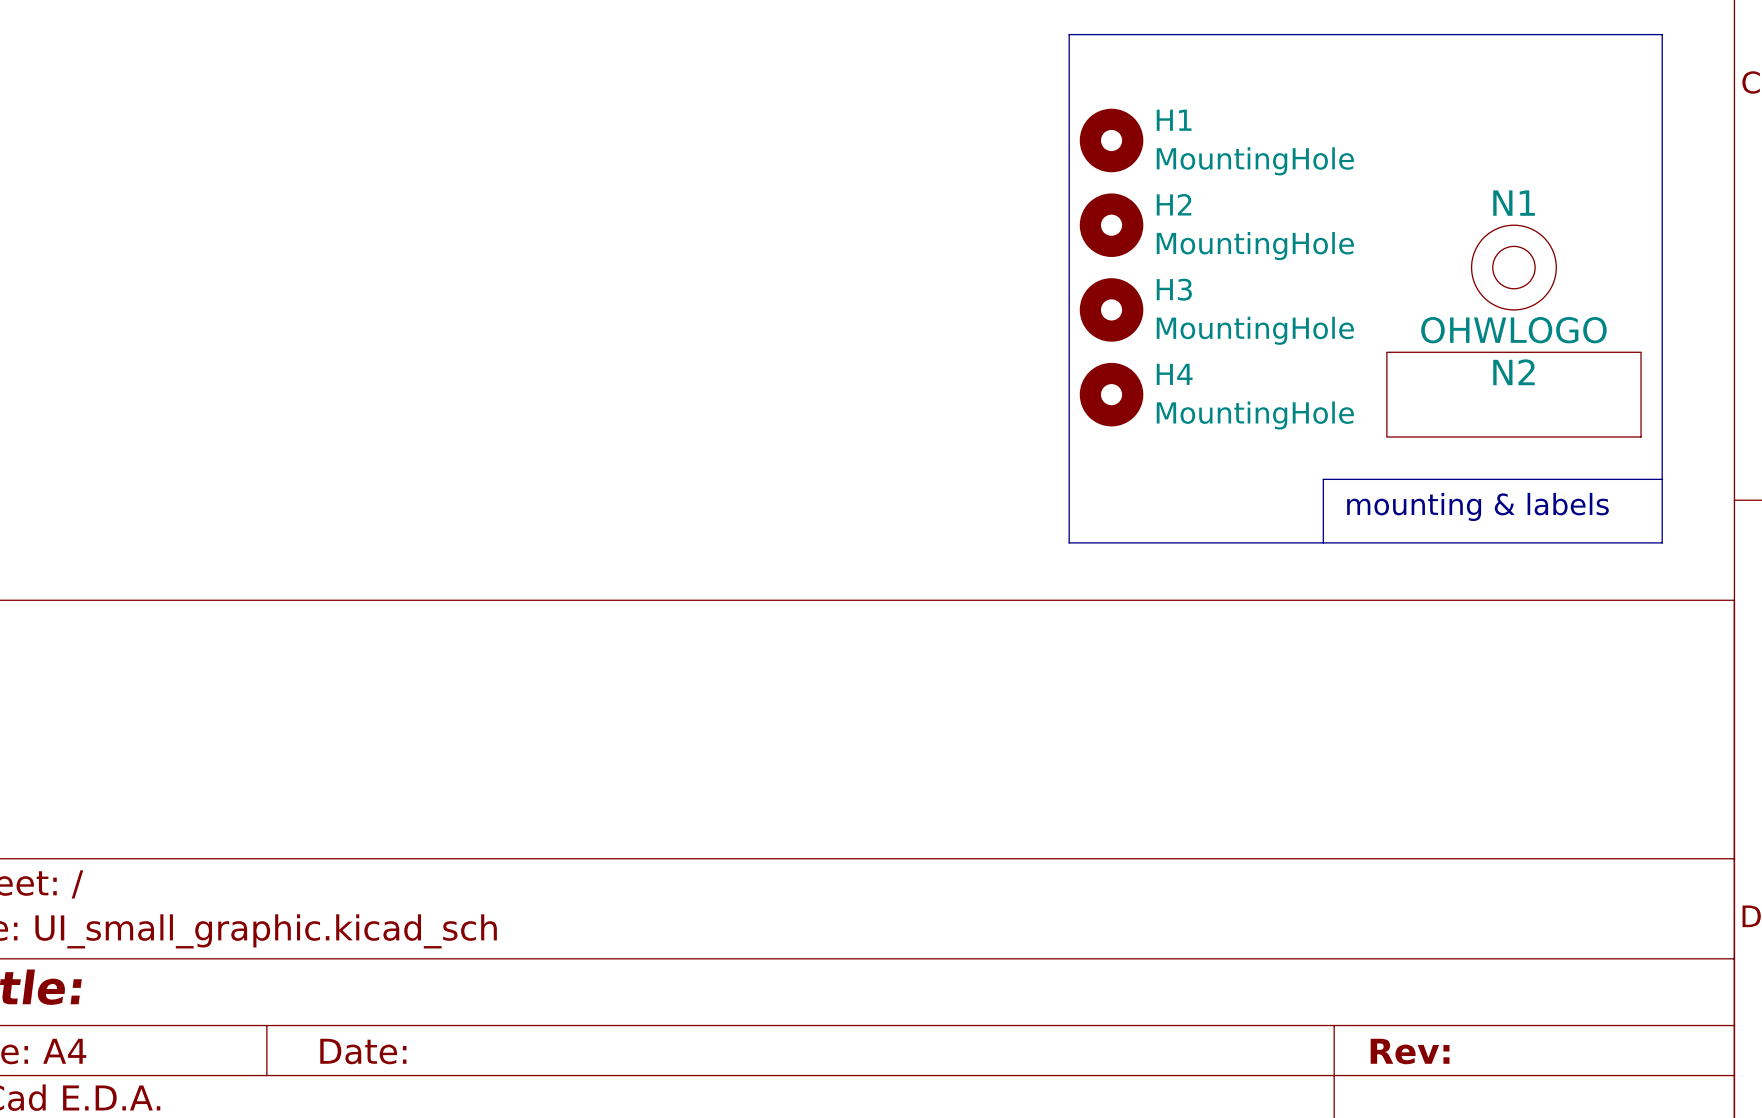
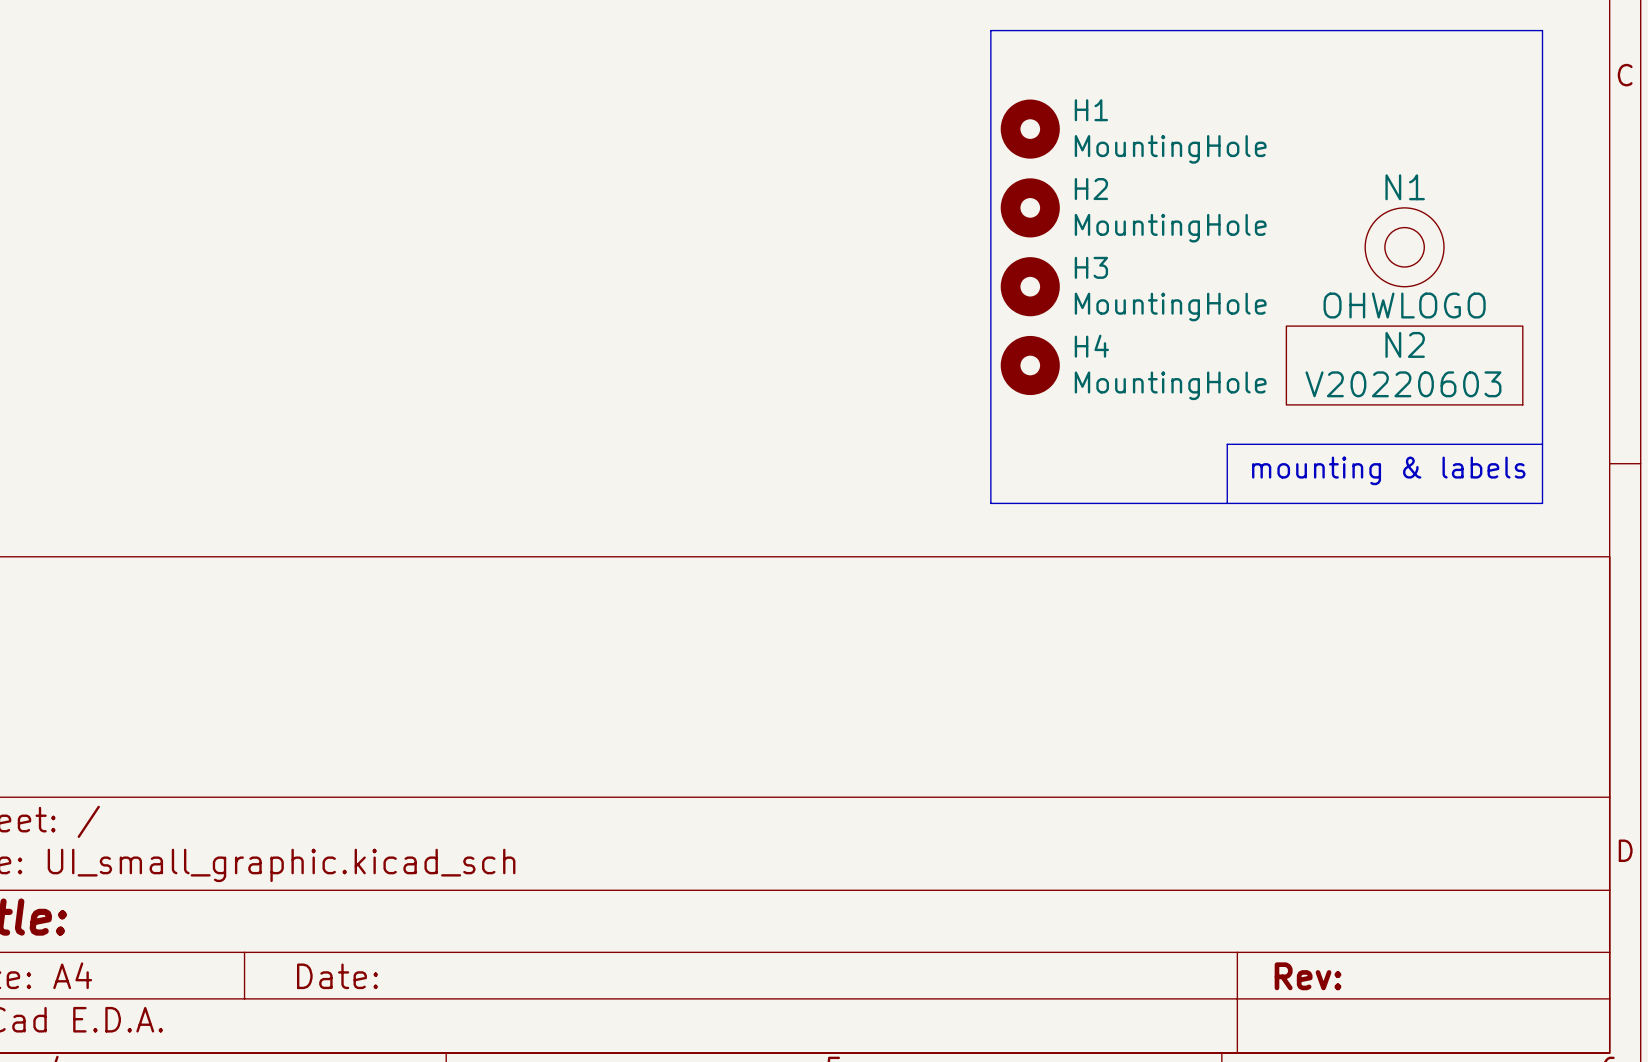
N2 value: none -> V20220603 (1403, 384)

